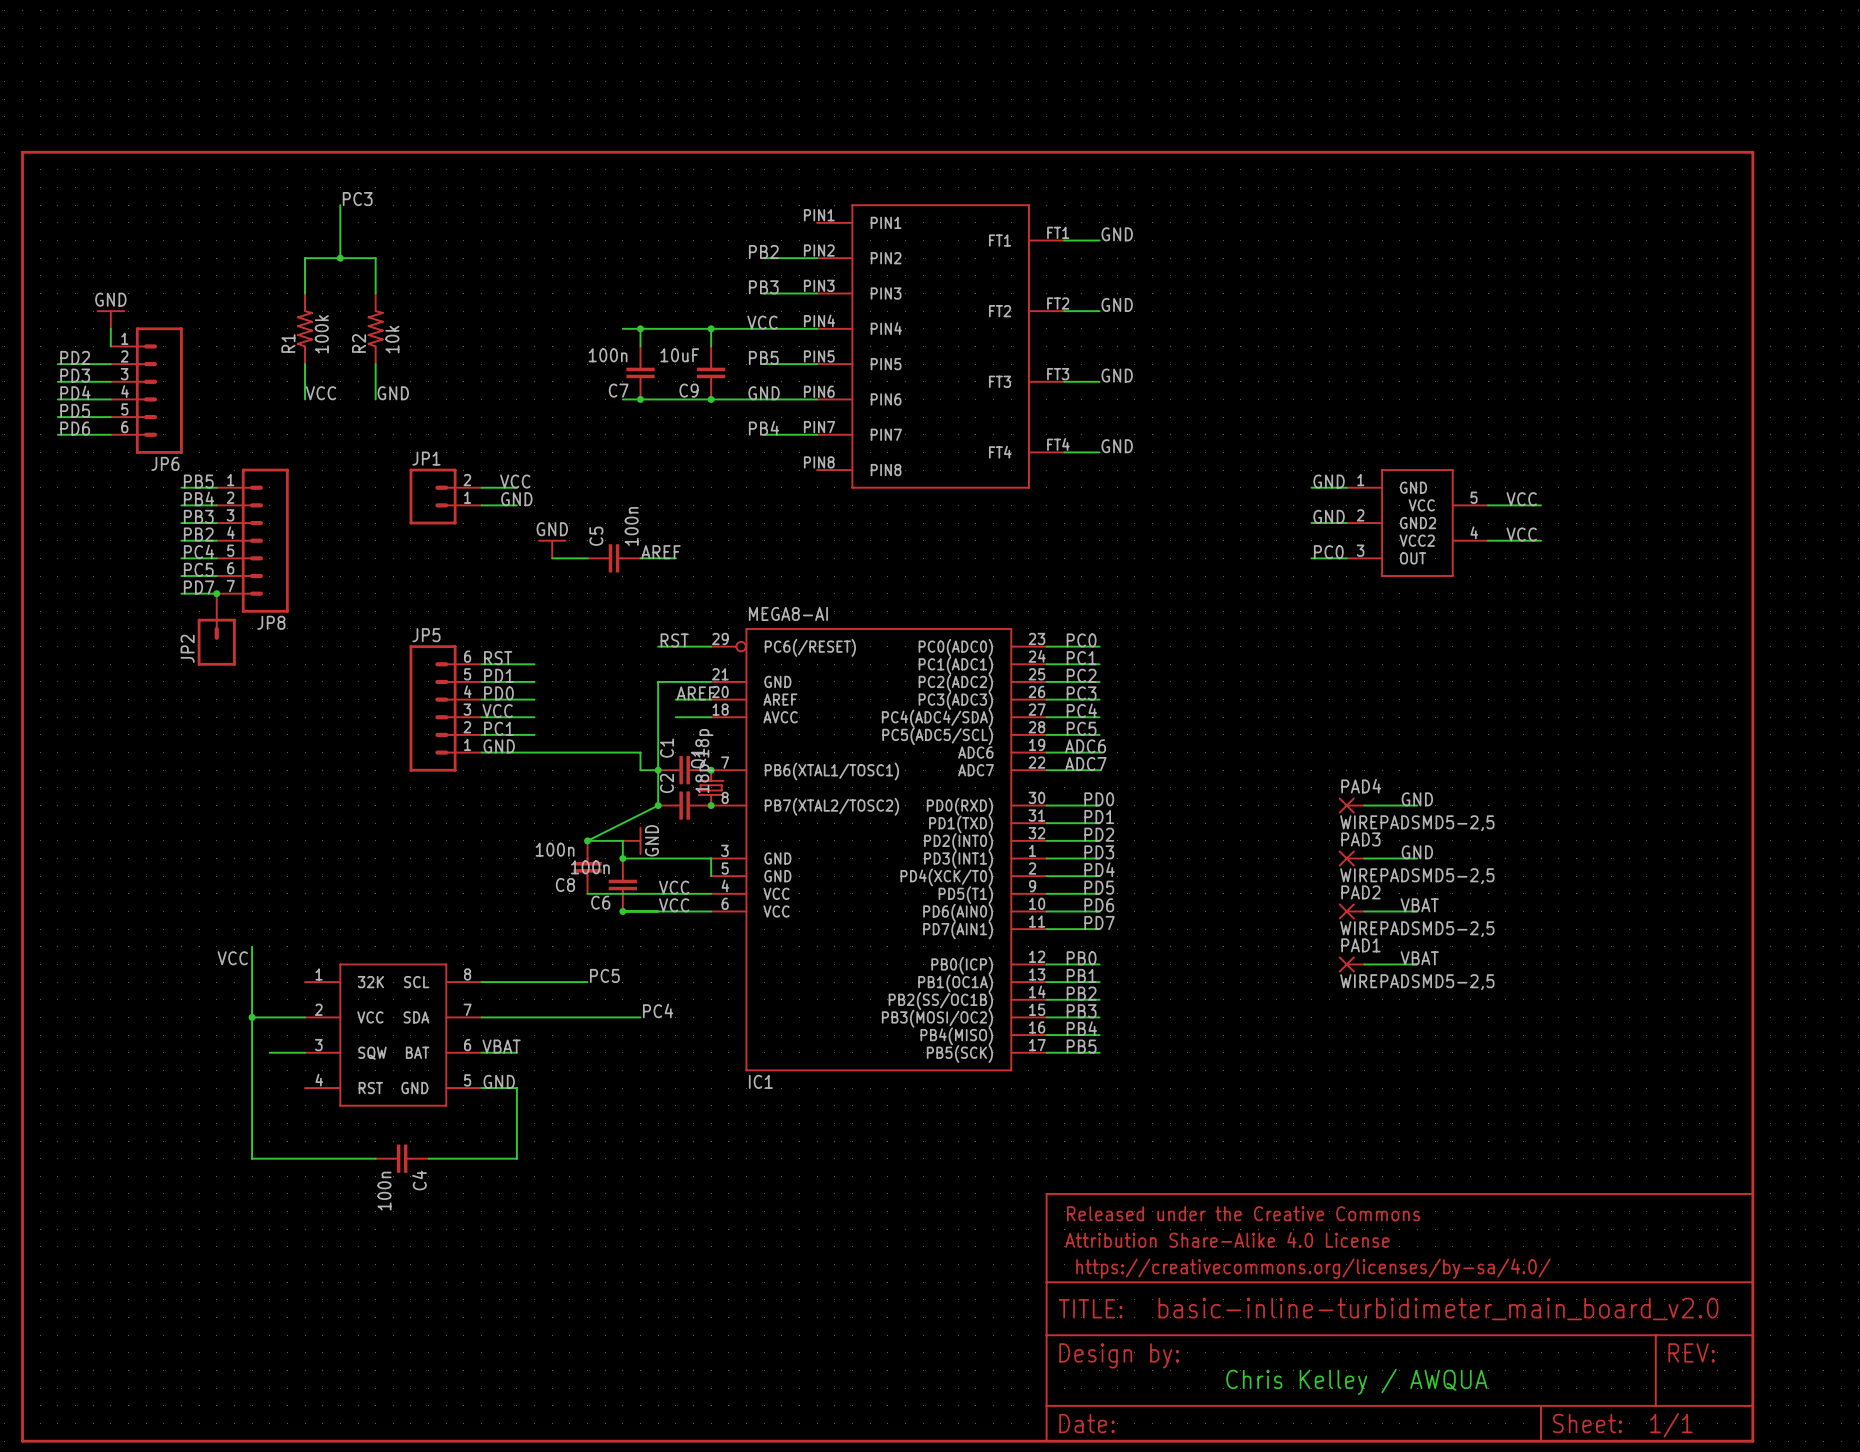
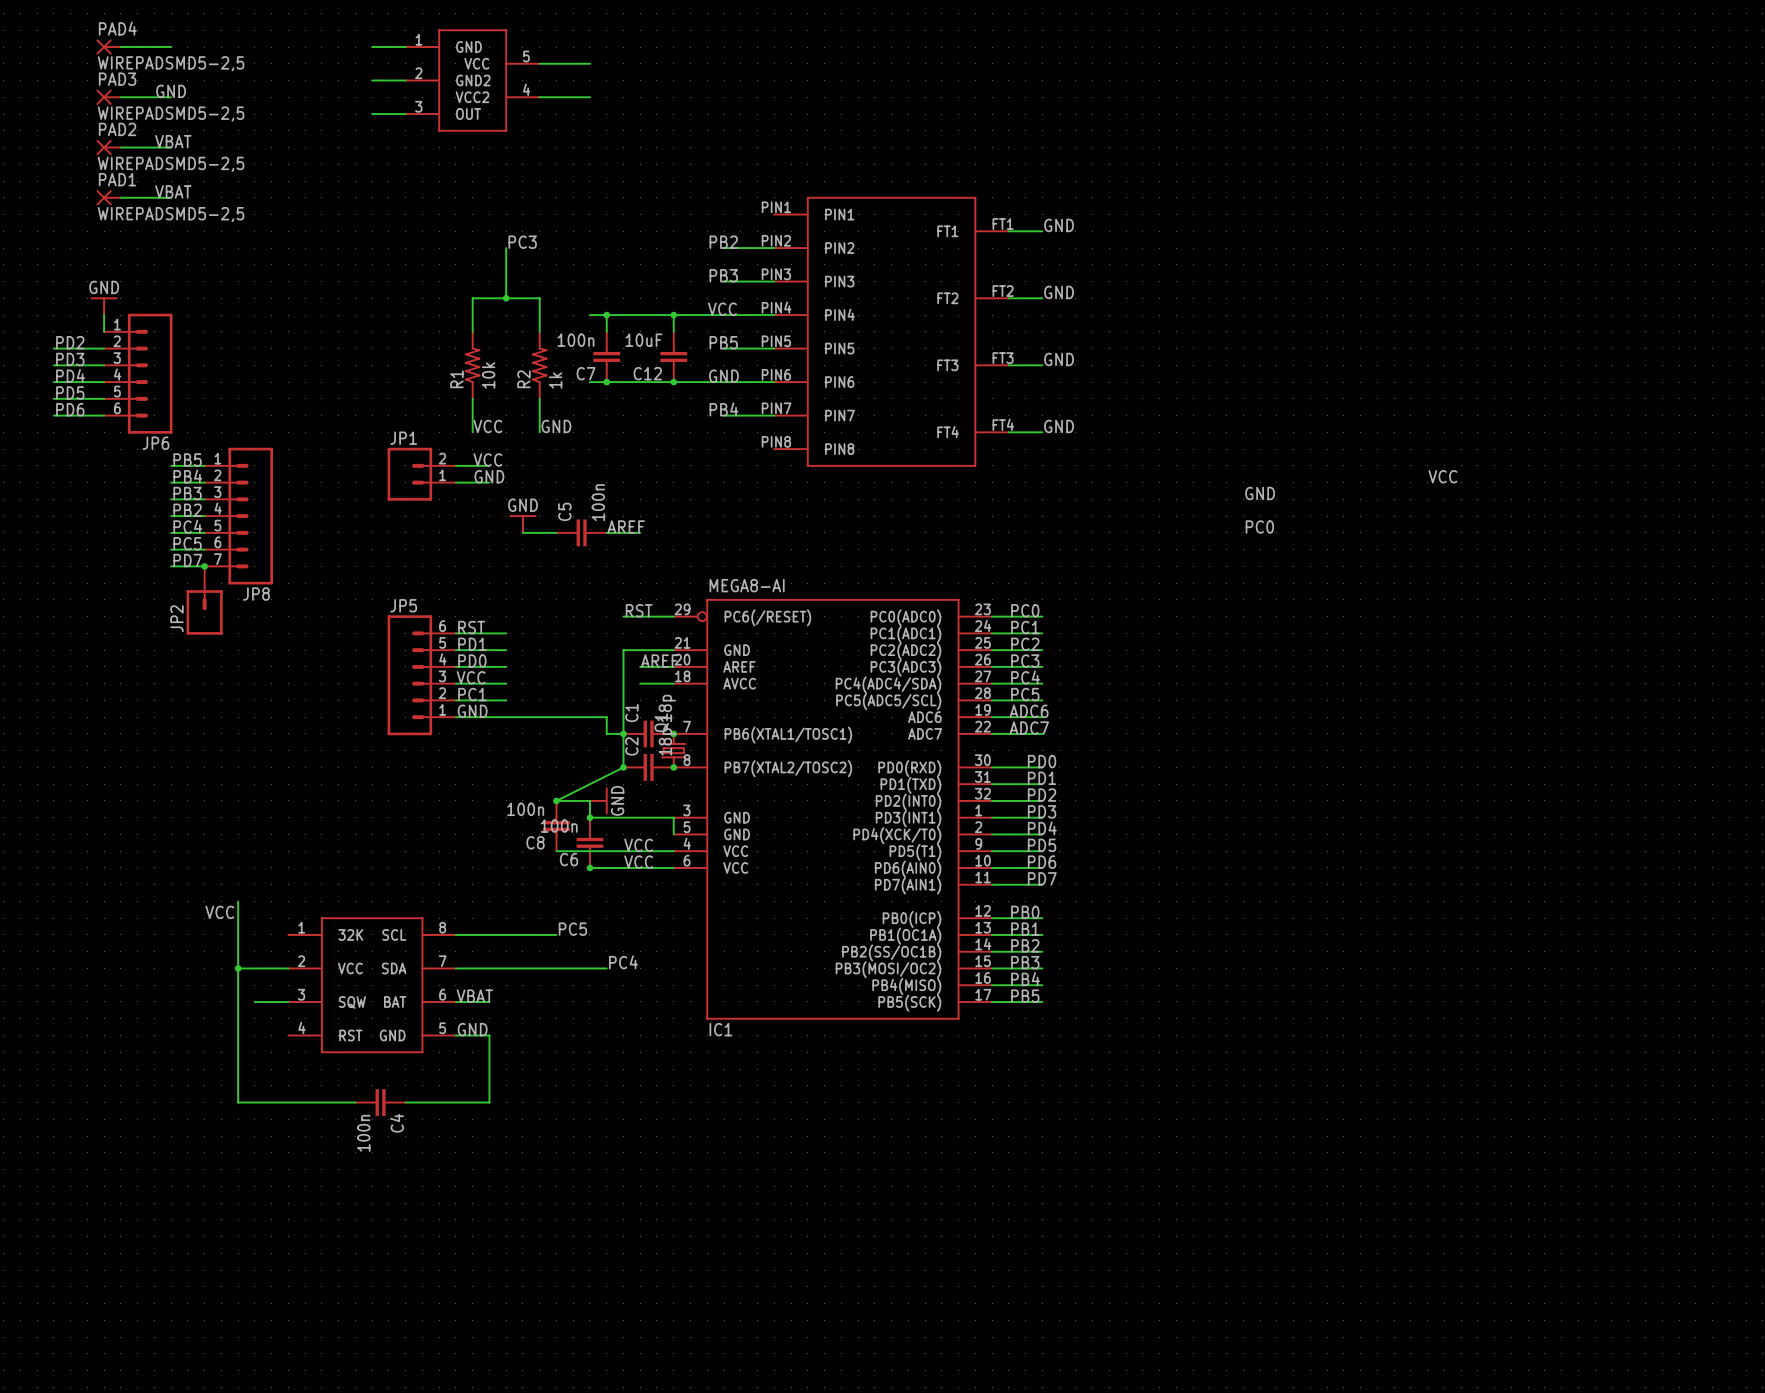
wire: none -> (120, 47) (171, 47)
wire: none -> (372, 47) (405, 47)
wire: none -> (539, 63) (589, 63)
wire: none -> (372, 80) (405, 80)
part: none -> (472, 80)
label: none -> GND (171, 91)
wire: none -> (120, 97) (171, 97)
wire: none -> (539, 97) (589, 97)
wire: none -> (372, 114) (405, 114)
label: none -> VBAT (173, 141)
label: none -> VBAT (173, 191)
label: PC3 (357, 199) -> none
wire: none -> (120, 197) (171, 197)
wire: (340, 205) (340, 258) -> none
label: none -> PC3 (522, 242)
junction: (340, 258) -> none
wire: none -> (506, 248) (506, 298)
wire: (305, 293) (305, 258) (375, 258) (375, 293) -> none
junction: none -> (506, 298)
R1 position: (305, 328) -> (472, 365)
R2 position: (375, 328) -> (539, 365)
R1 value: 100k (321, 334) -> 10k (488, 375)
R2 value: 10k (392, 339) -> 1k (555, 380)
wire: none -> (472, 331) (472, 298) (539, 298) (539, 331)
wire: (305, 364) (305, 399) -> none
wire: (375, 364) (375, 399) -> (472, 398) (472, 432)
C9 name: C9 (689, 390) -> C12 (647, 373)
label: VCC (321, 393) -> none
label: GND (393, 393) -> none
wire: none -> (539, 398) (539, 432)
label: none -> VCC (487, 426)
label: none -> GND (556, 426)
label: GND (1329, 481) -> none
wire: (1311, 487) (1346, 487) -> none
wire: (1488, 505) (1541, 505) -> none
wire: (1311, 523) (1346, 523) -> none
part: (1417, 523) -> none
label: VCC (1521, 534) -> none
wire: (1488, 540) (1541, 540) -> none
wire: (1311, 558) (1346, 558) -> none
part: (887, 796) -> none
label: GND (1417, 799) -> none
PAD4 position: (1351, 805) -> (108, 47)
wire: (1364, 805) (1417, 805) -> none
label: GND (1417, 852) -> none
PAD3 position: (1351, 858) -> (108, 97)
wire: (1364, 858) (1417, 858) -> none
label: VBAT (1419, 905) -> none
PAD2 position: (1351, 911) -> (108, 147)
wire: (1364, 911) (1417, 911) -> none
label: VBAT (1419, 958) -> none
PAD1 position: (1351, 964) -> (108, 197)
wire: (1364, 964) (1417, 964) -> none
part: (1399, 1317) -> none
text: Chris Kelley / AWQUA (1356, 1381) -> none

